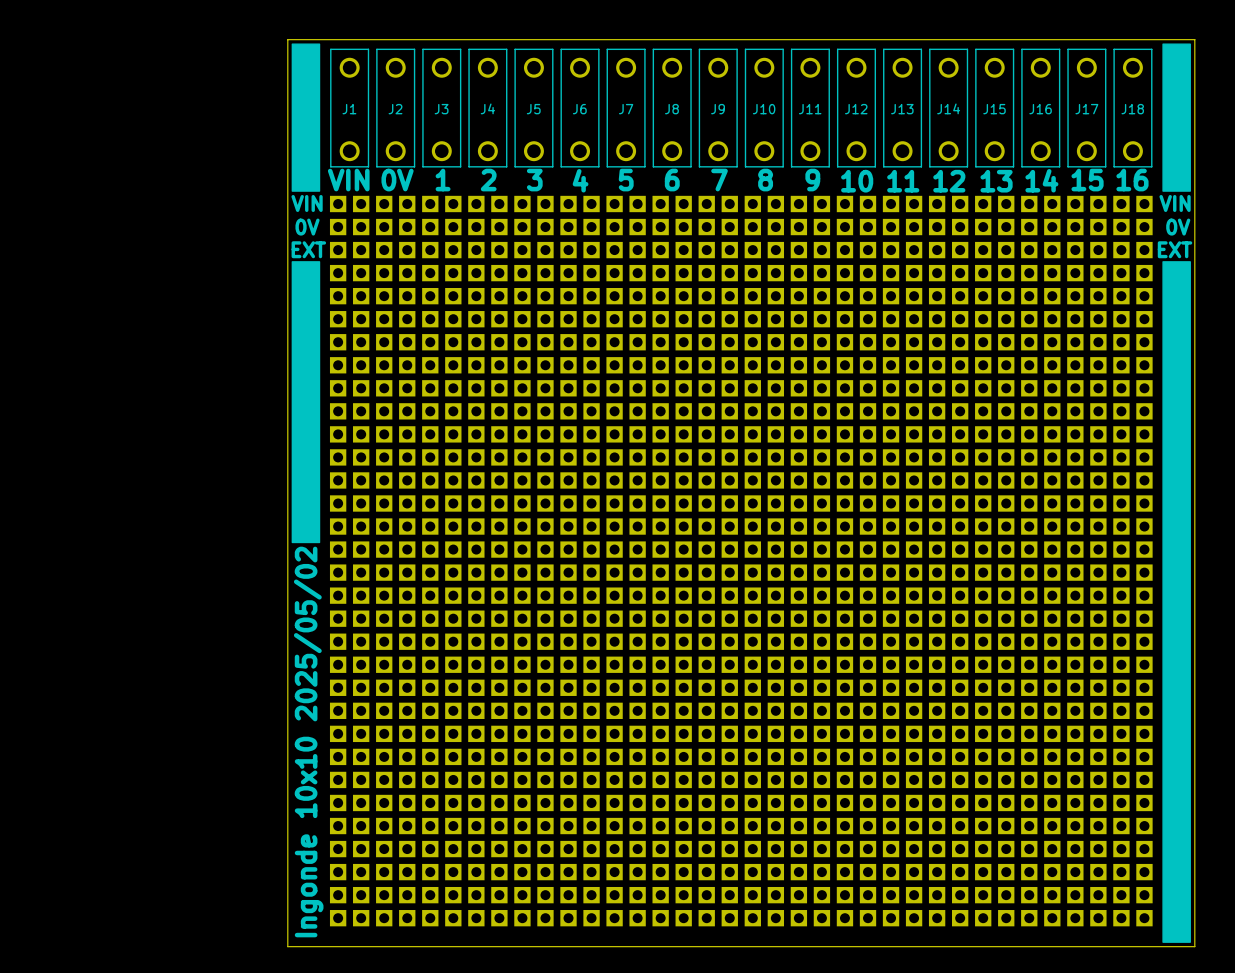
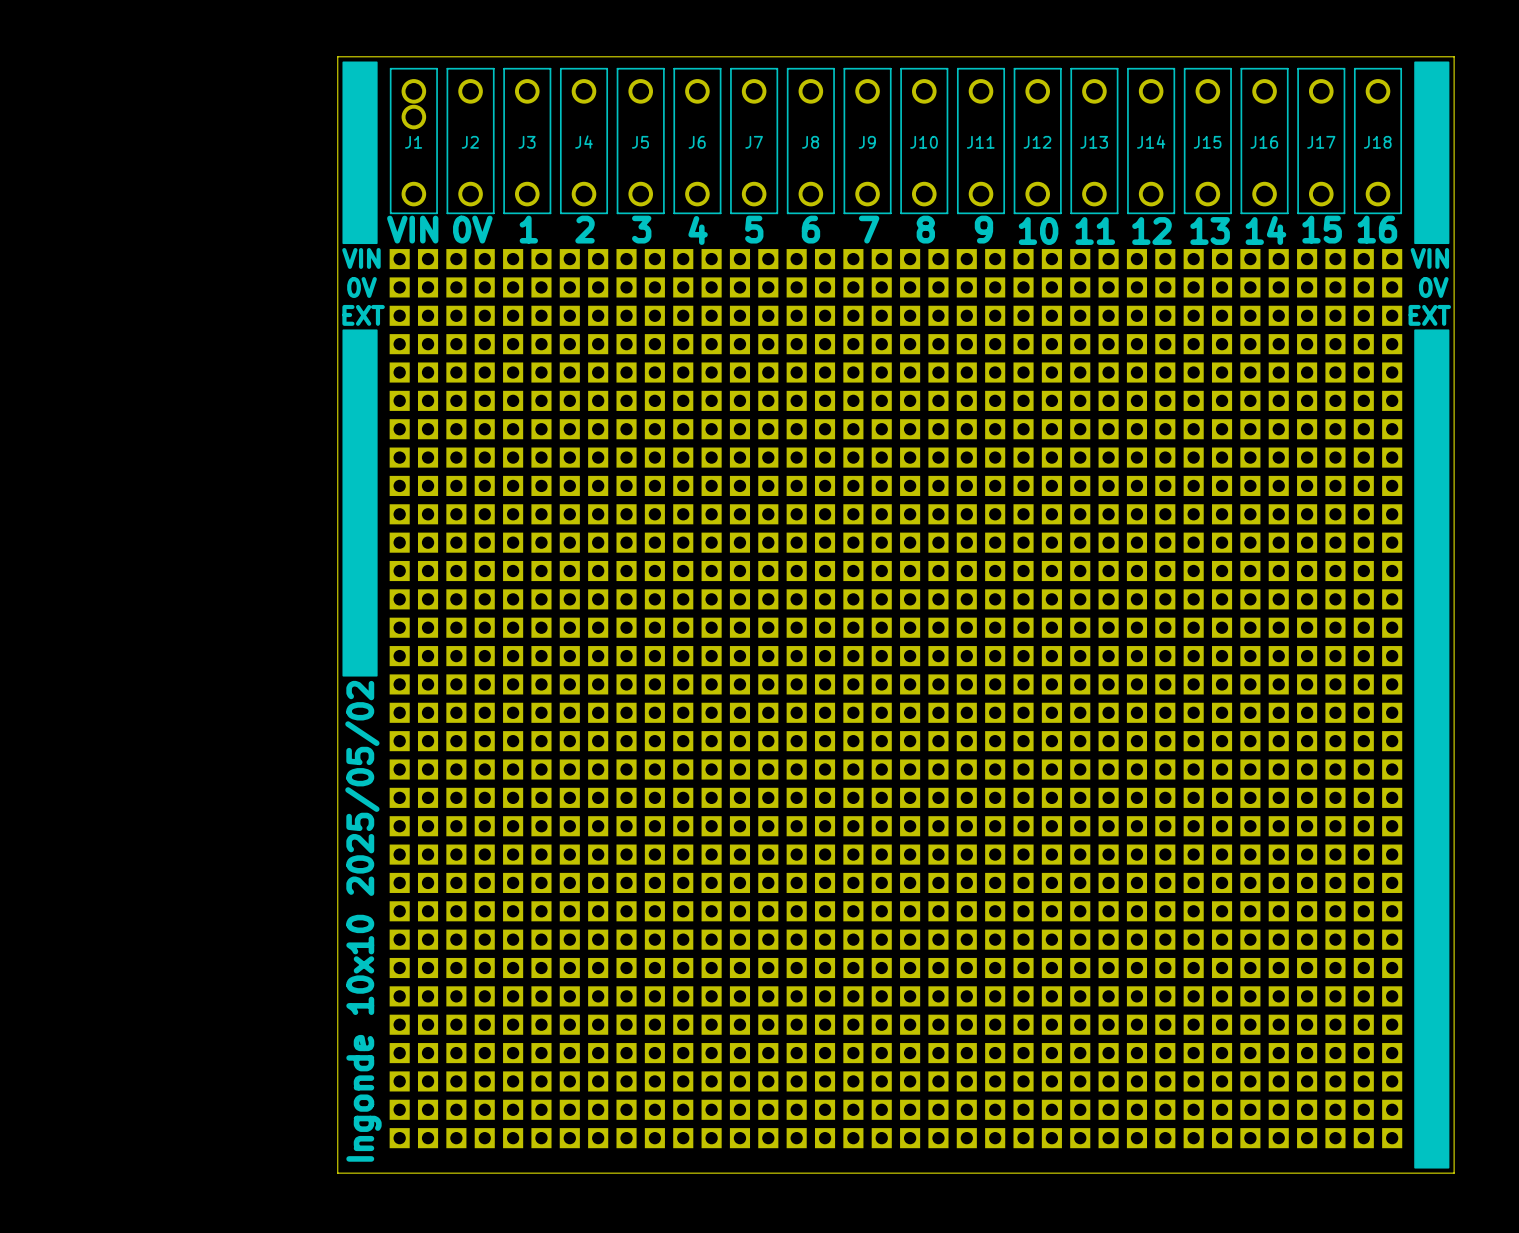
J1 footprint: [330, 48, 370, 168] -> [389, 67, 438, 215]

